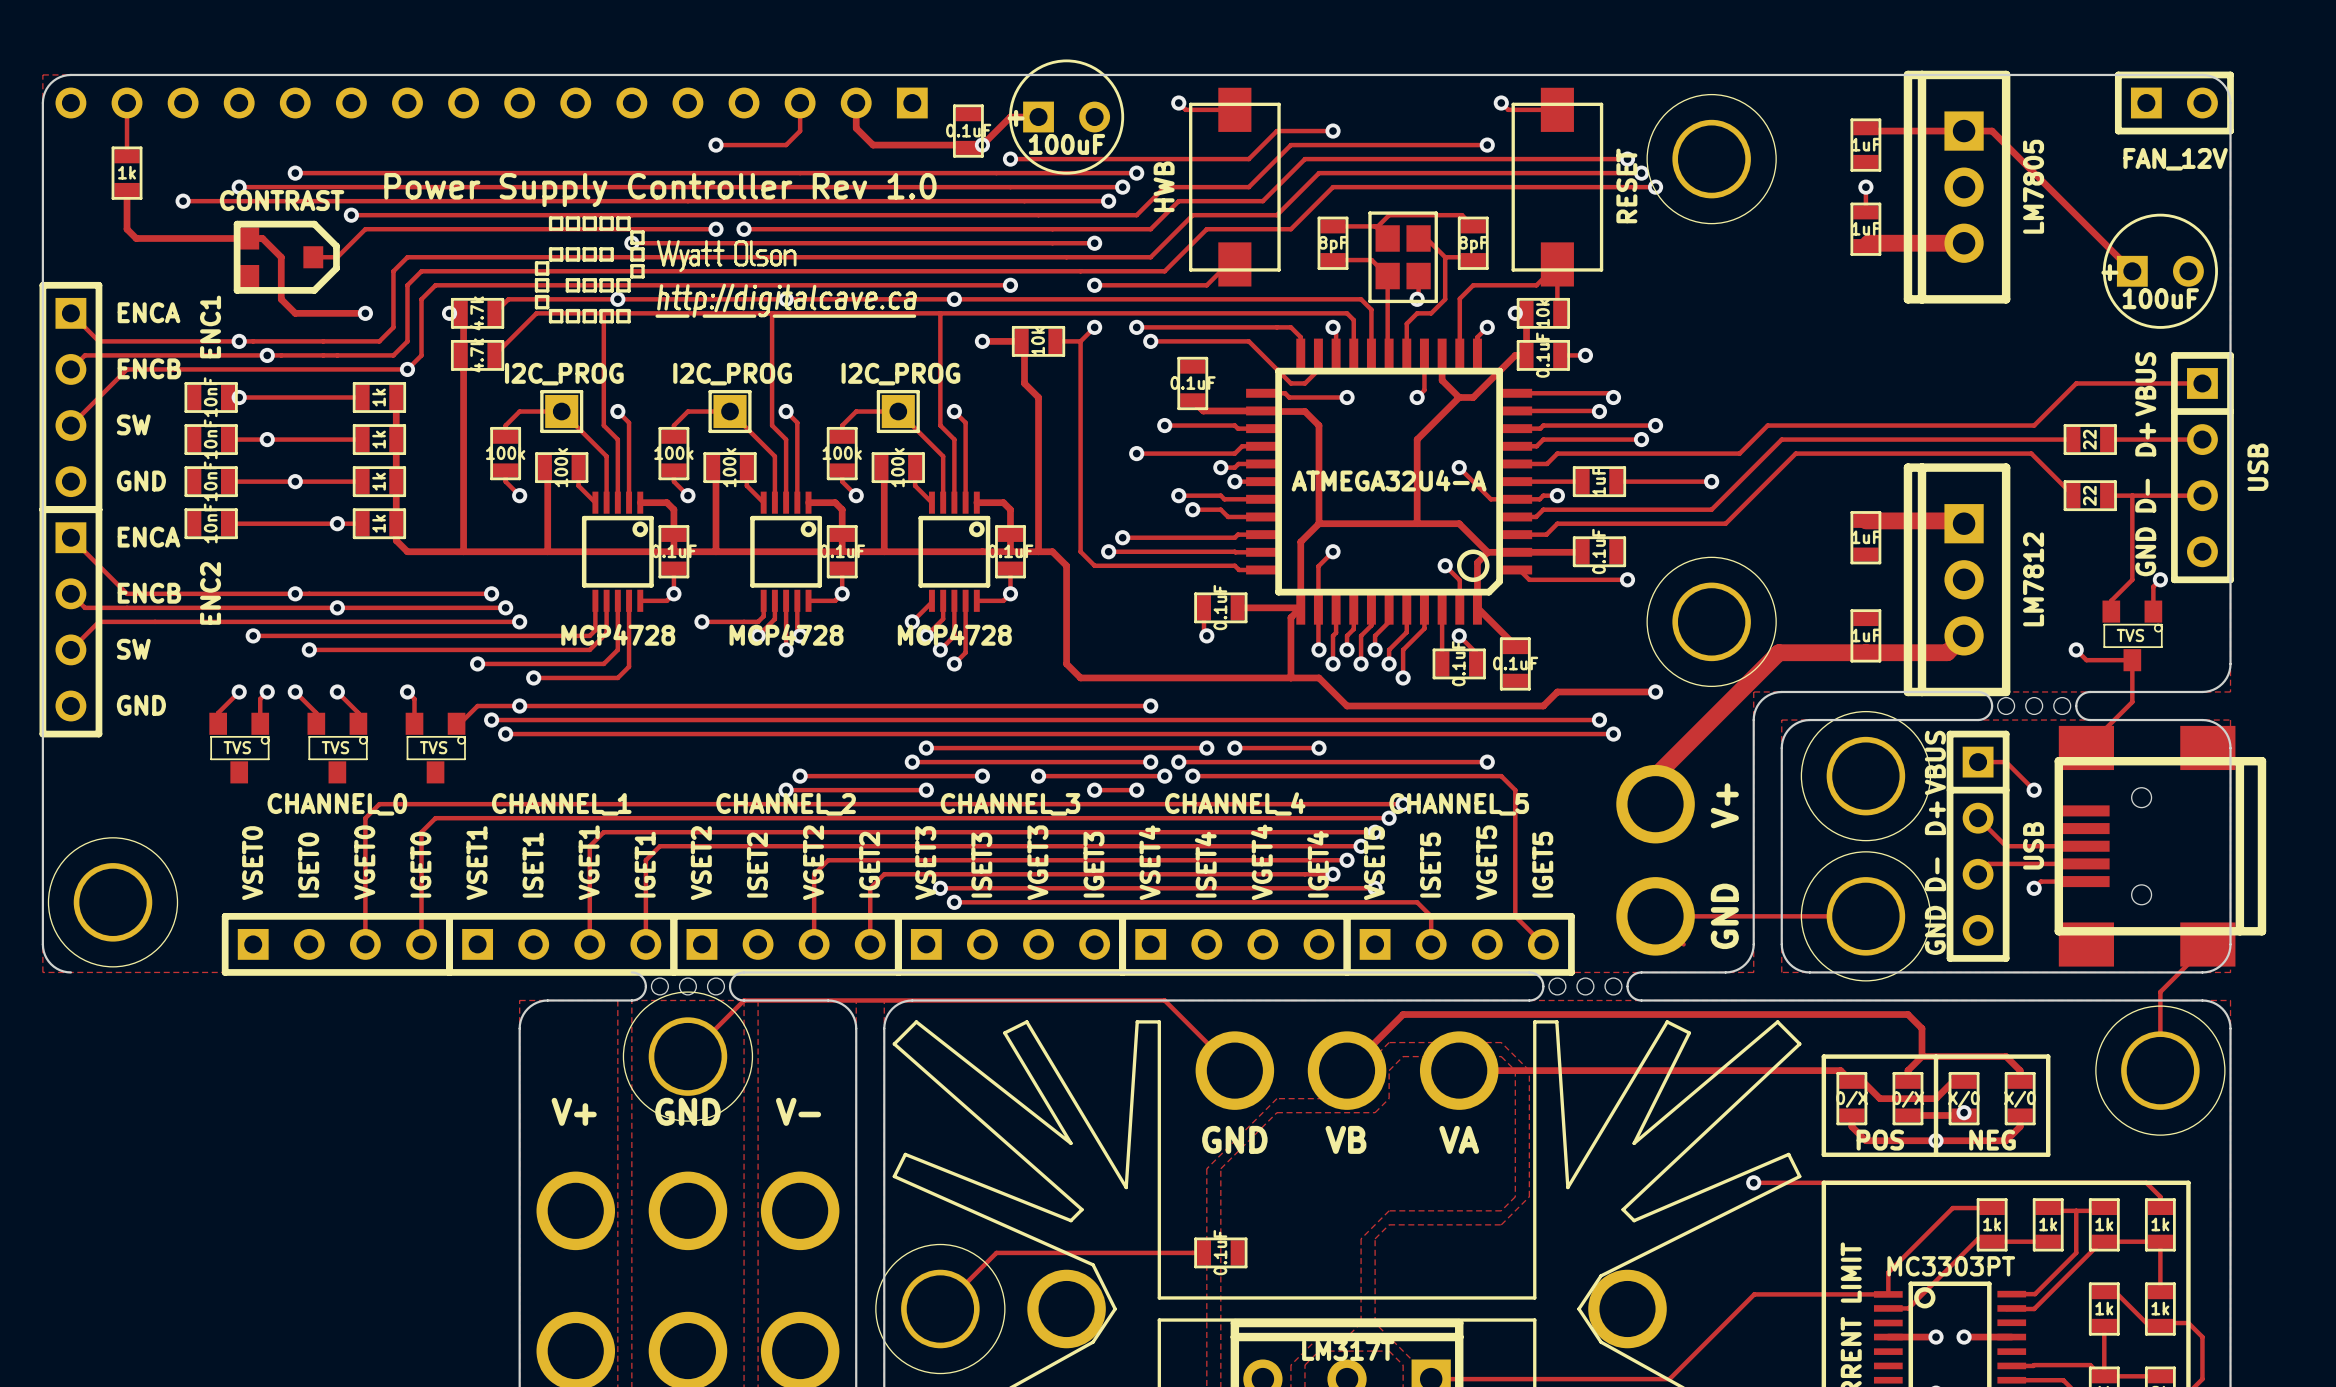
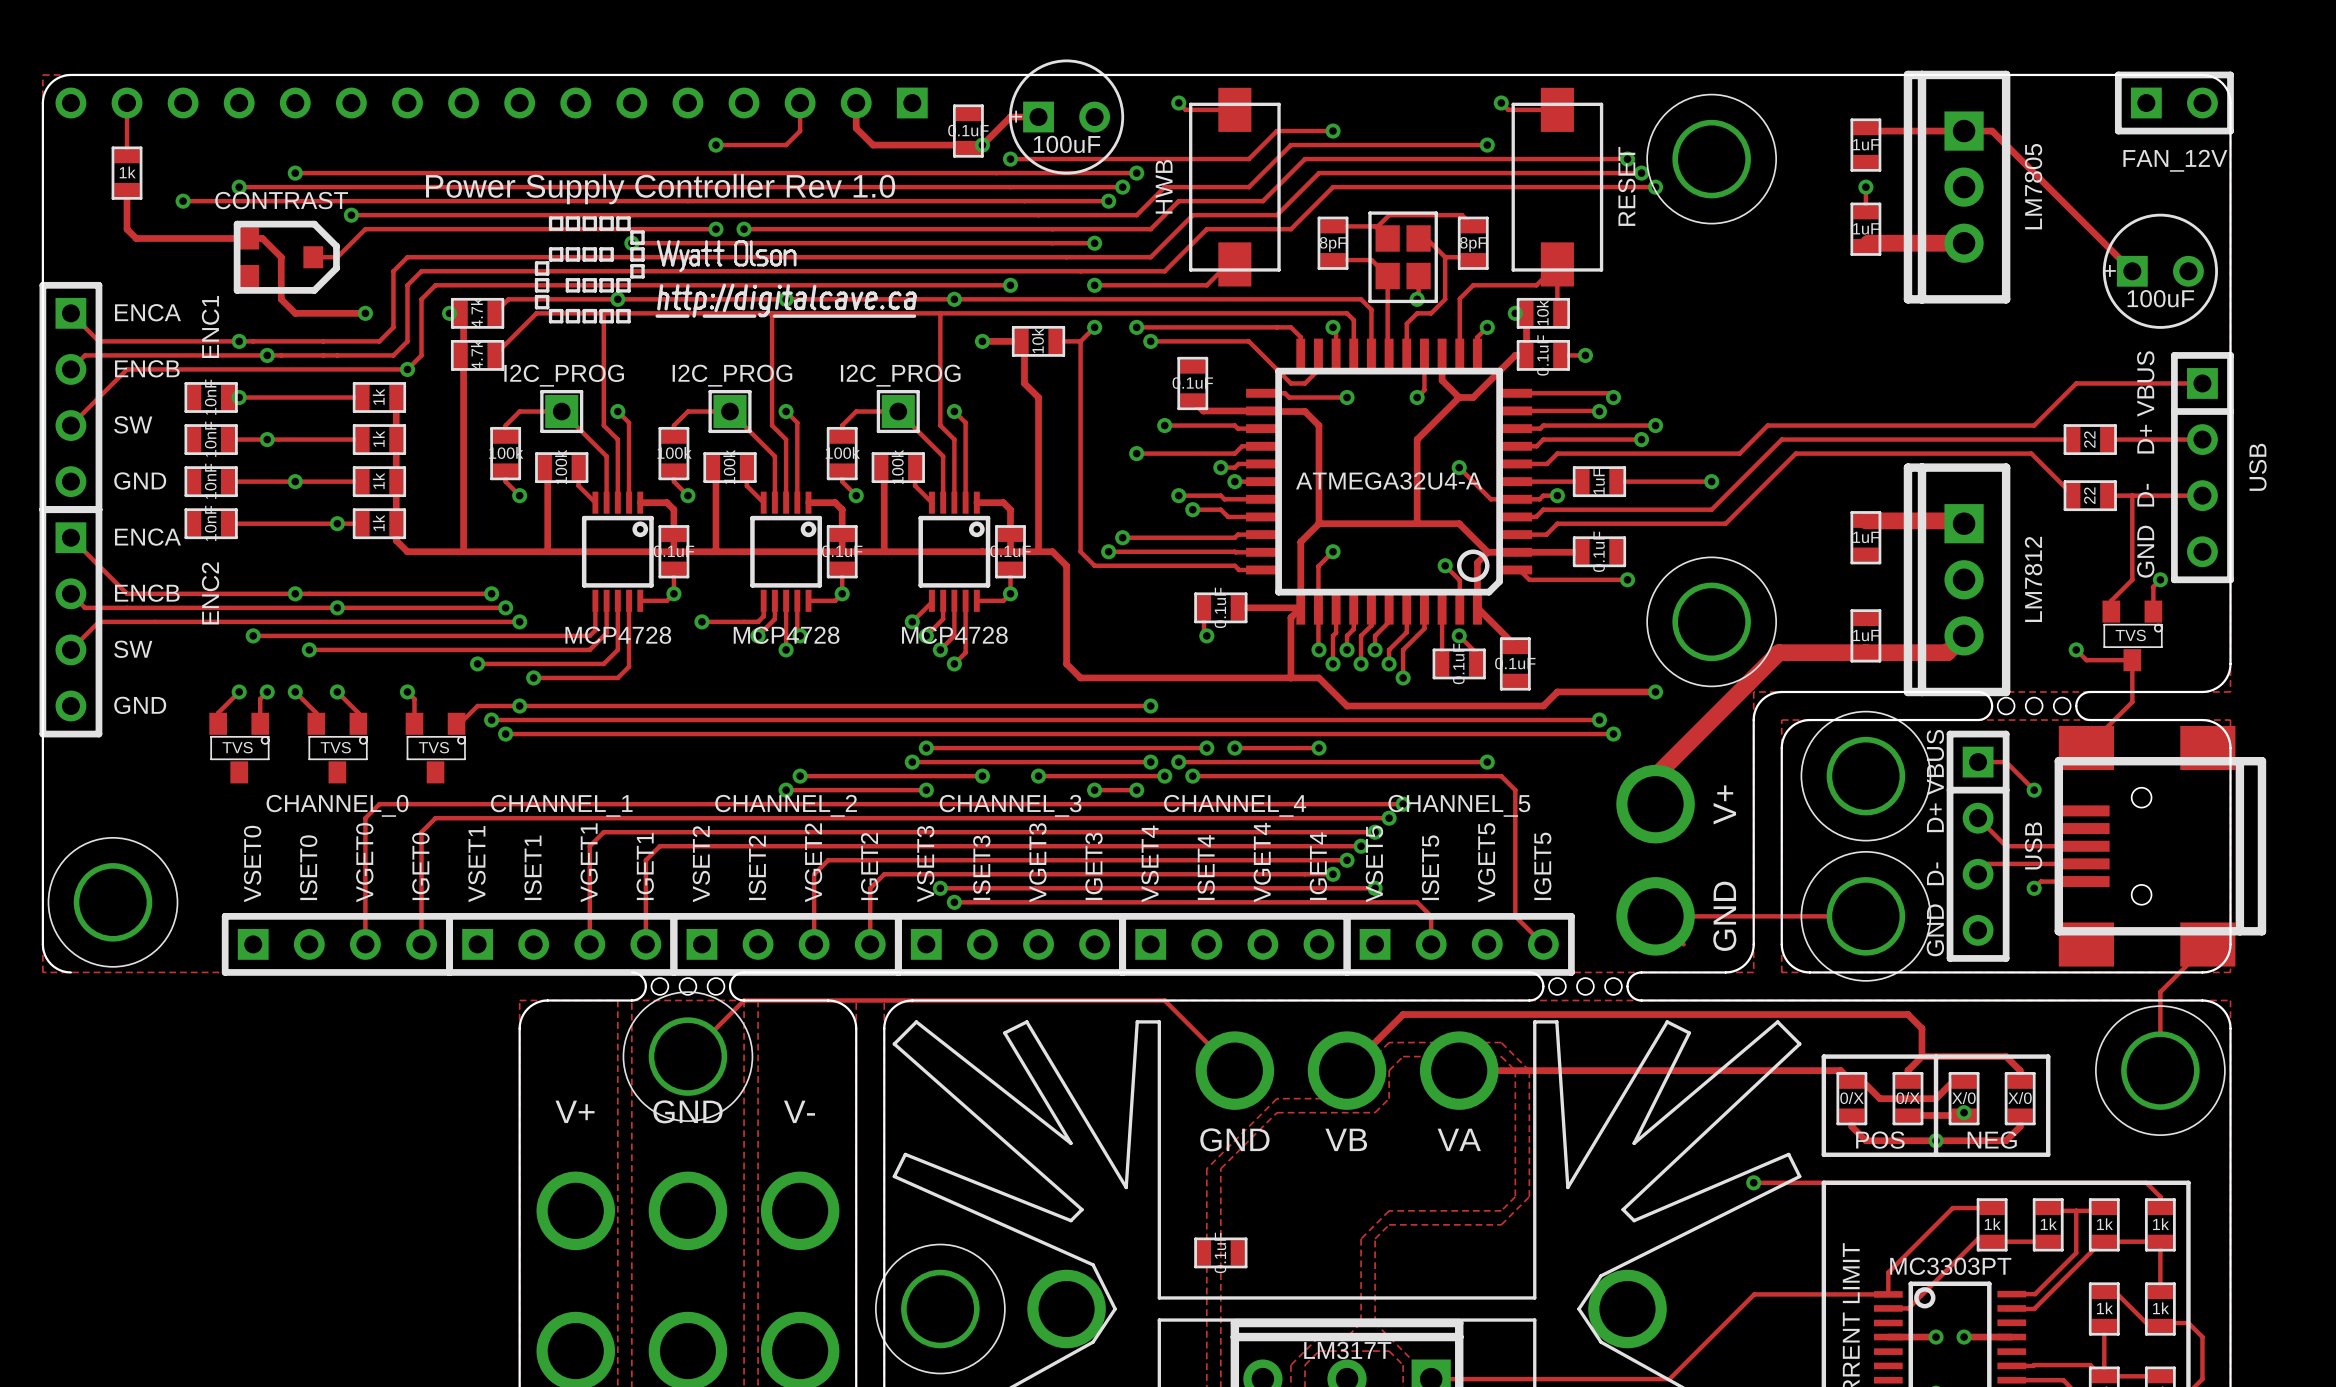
track: (1204, 1252) (996, 1252) (940, 1309) -> none

